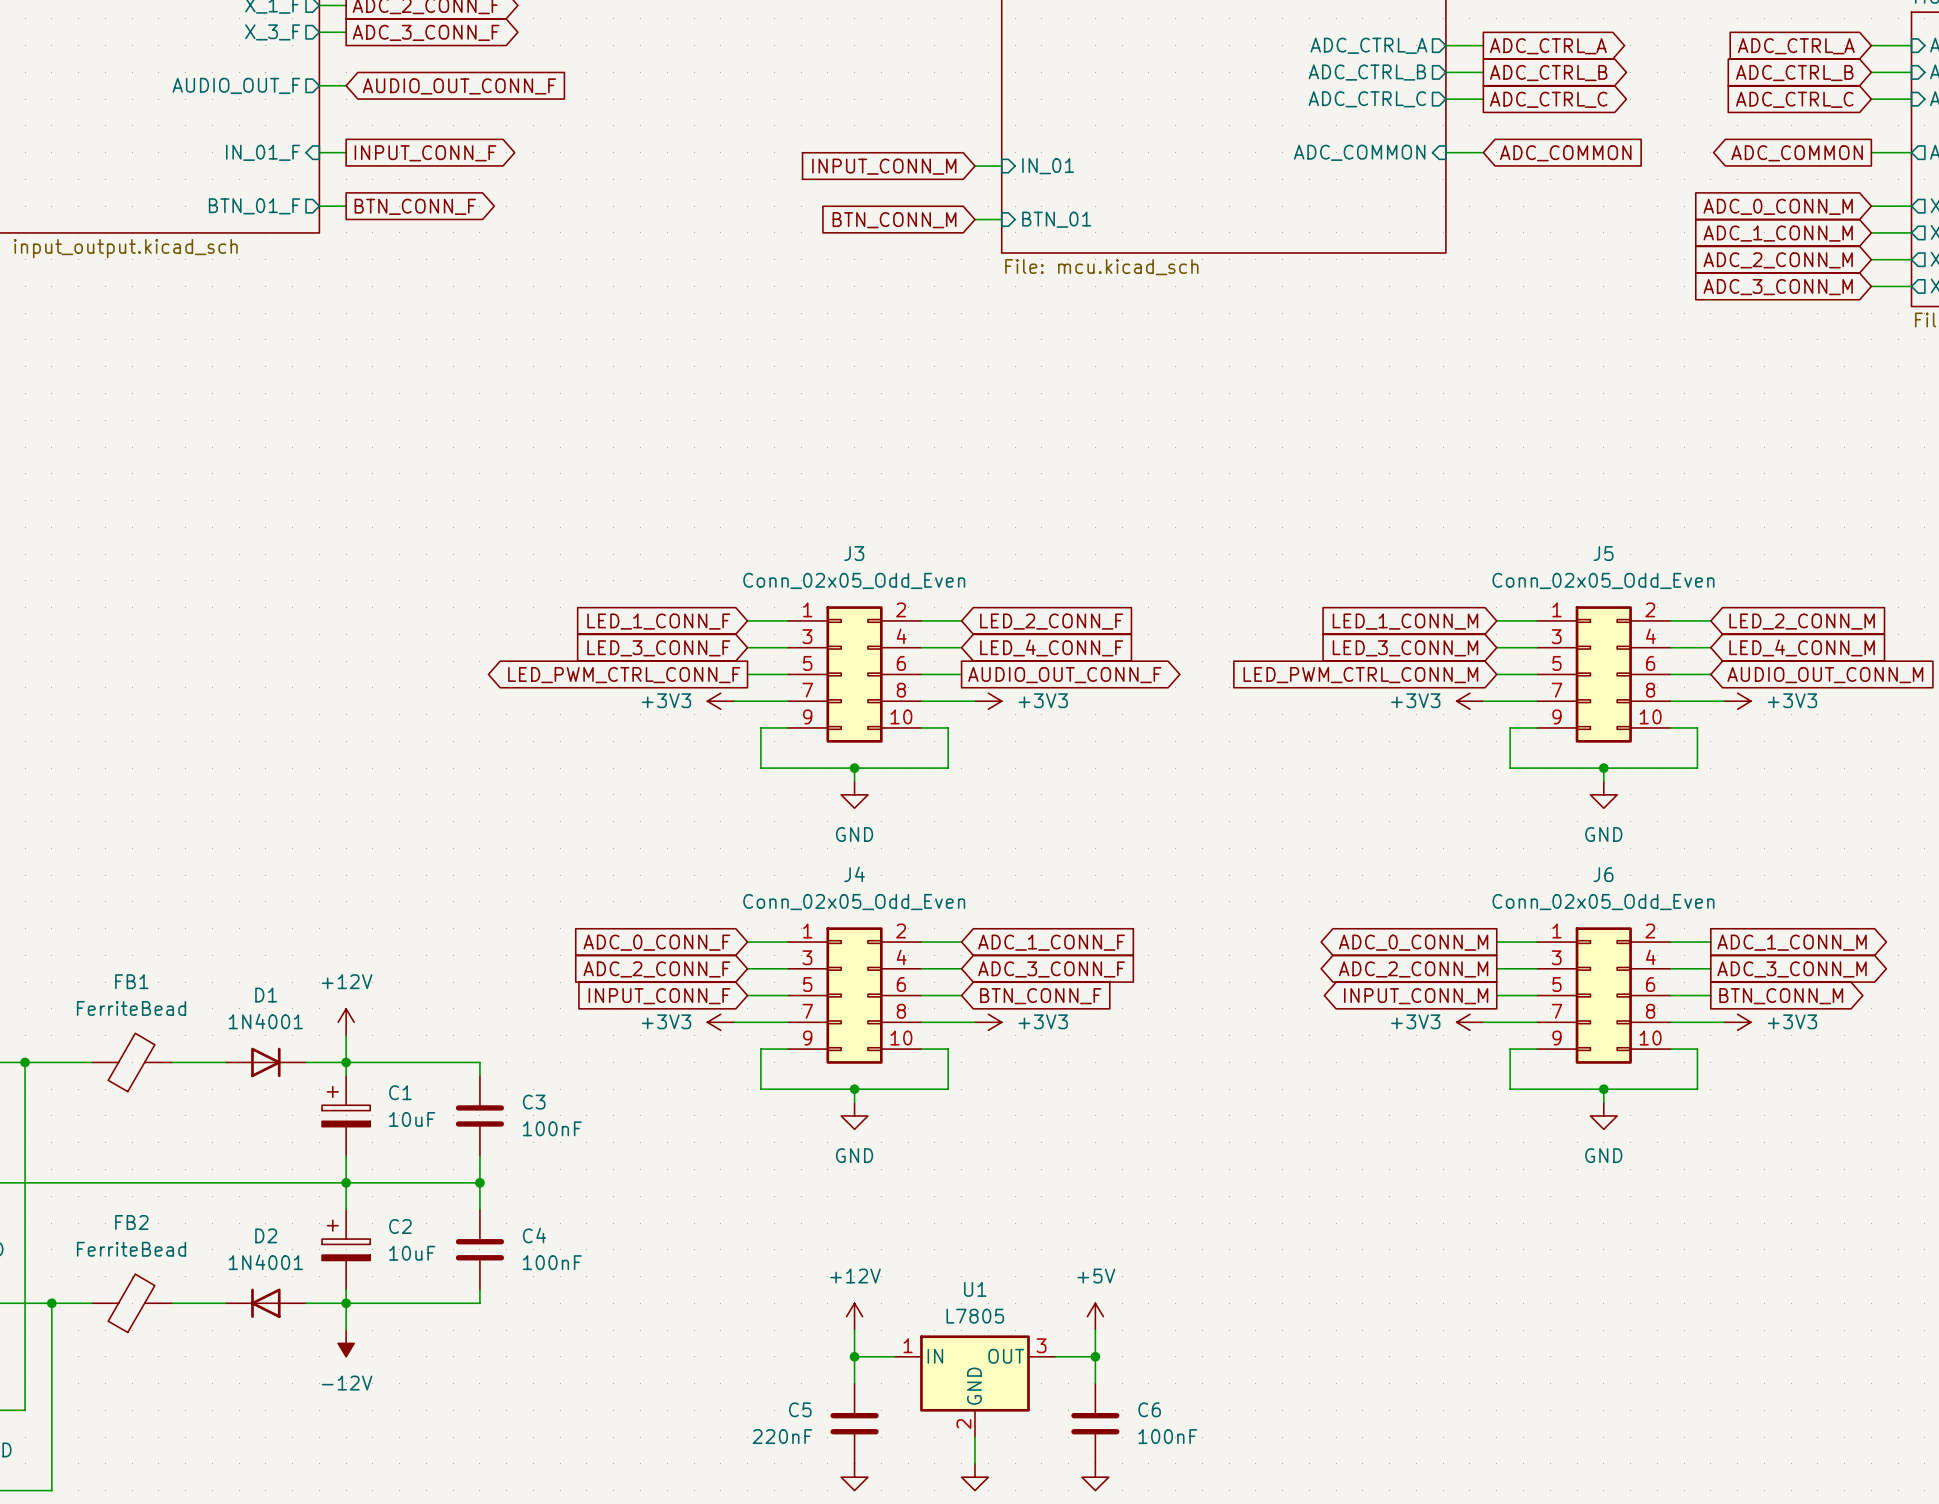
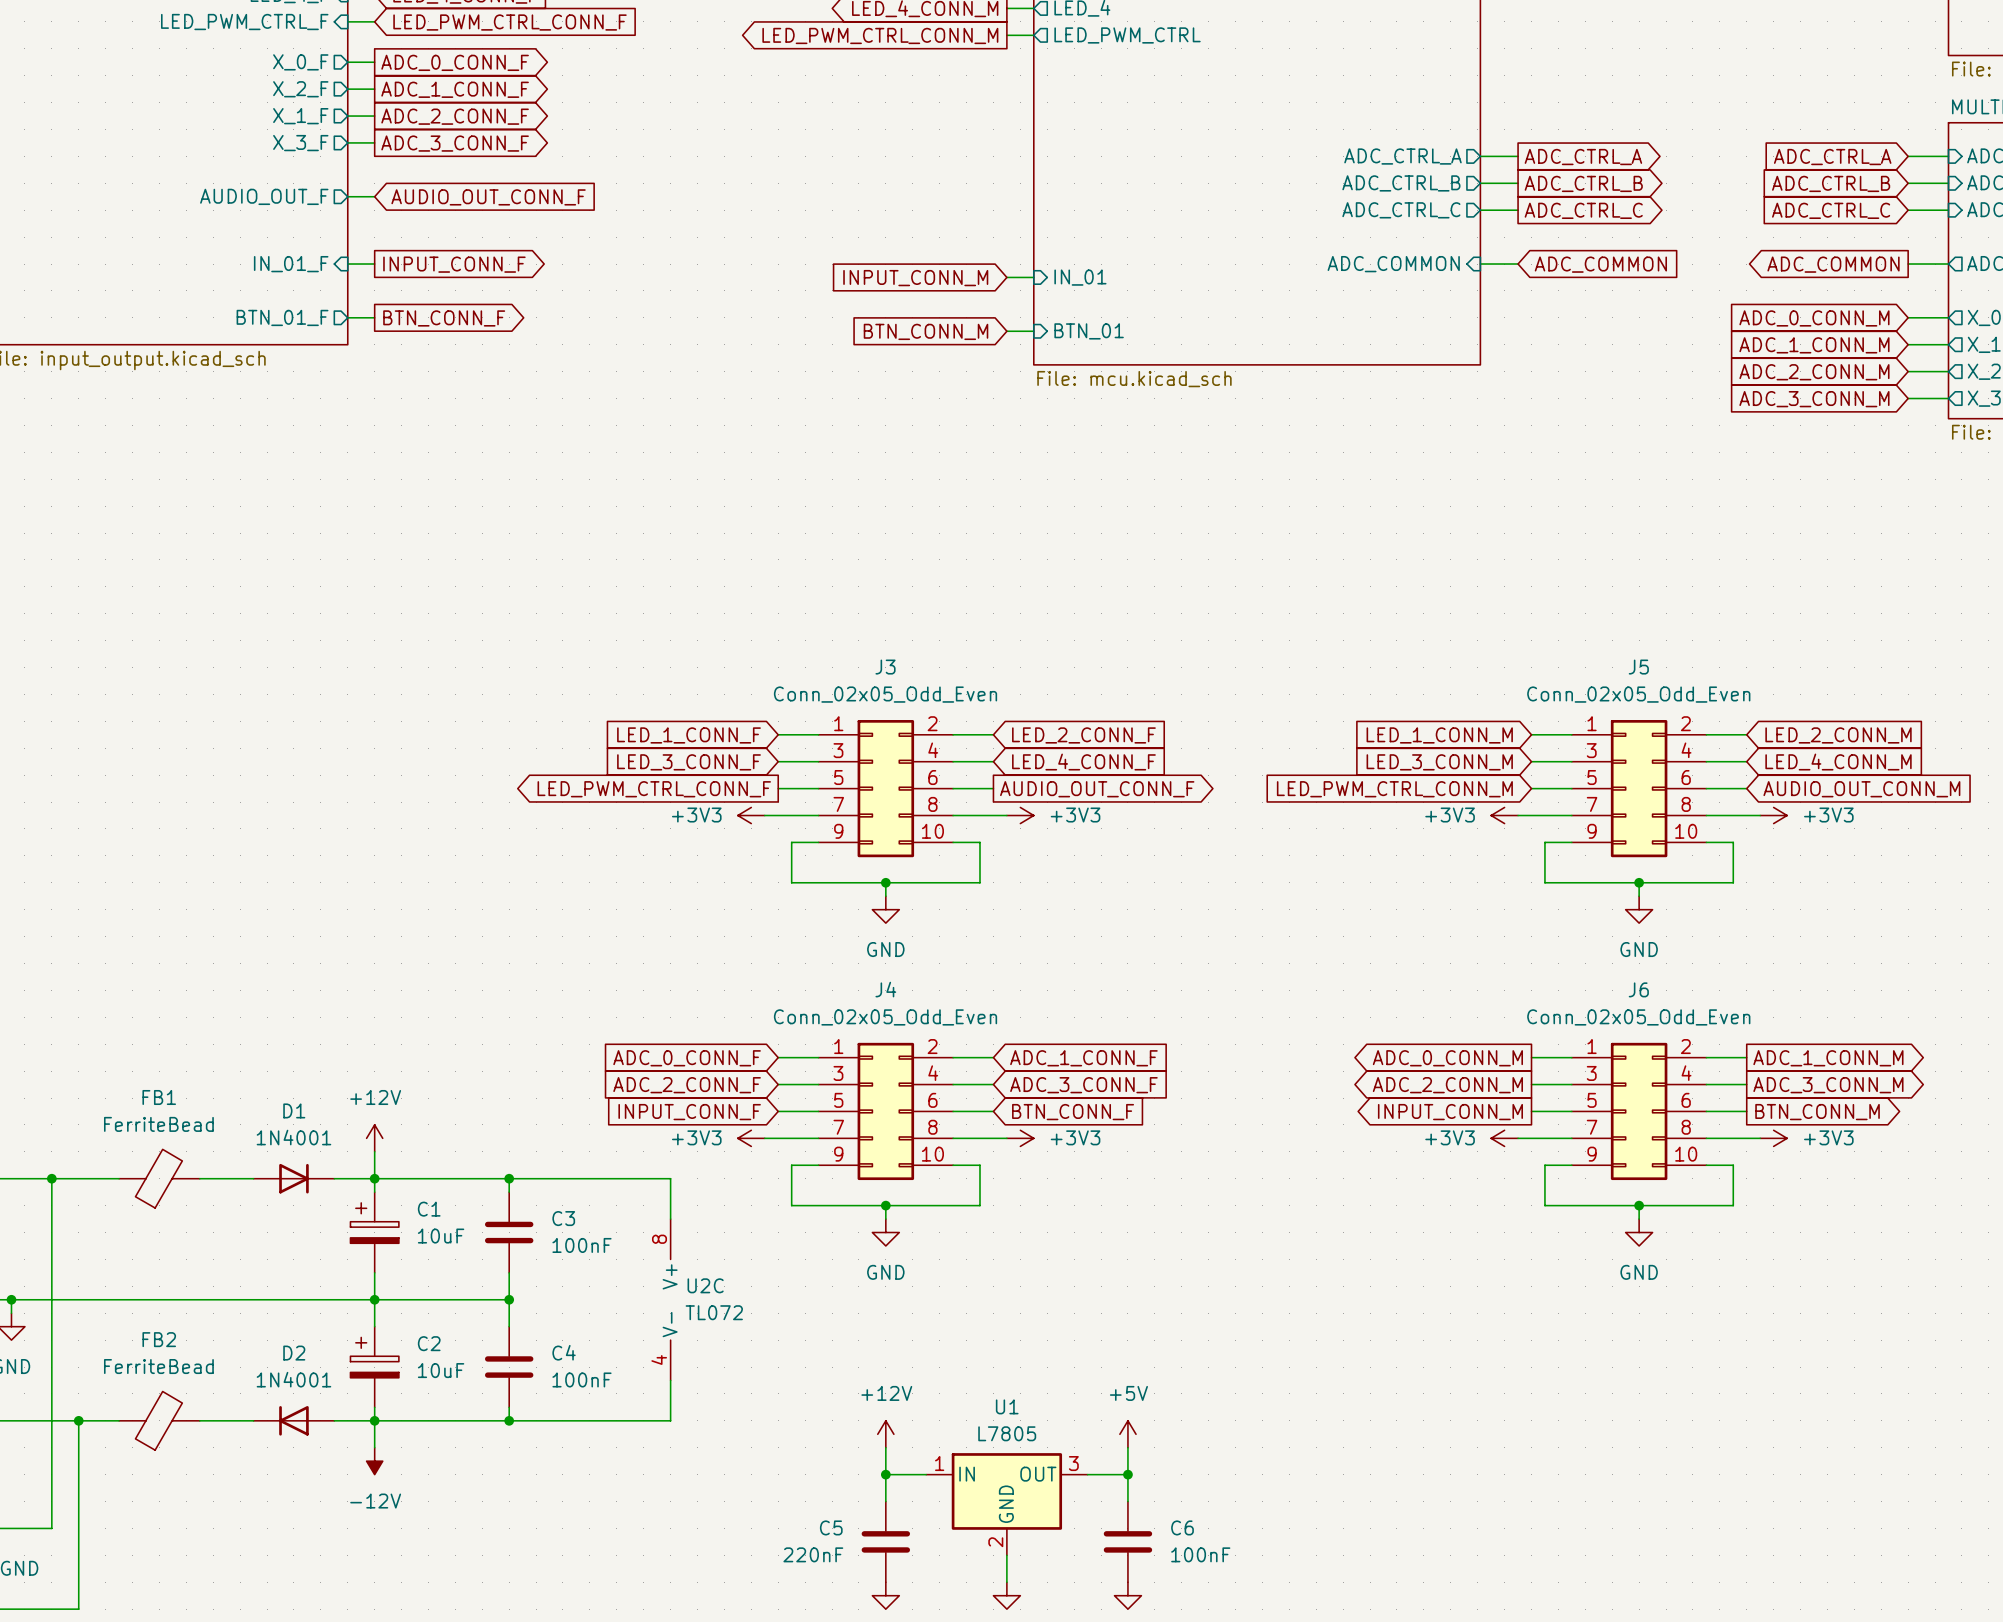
wire: none -> (509, 1178) (670, 1178) (670, 1219)
junction: none -> (509, 1178)
U2C: none -> TL072 (670, 1299)
wire: none -> (670, 1380) (670, 1420) (509, 1420)
junction: none -> (509, 1420)

